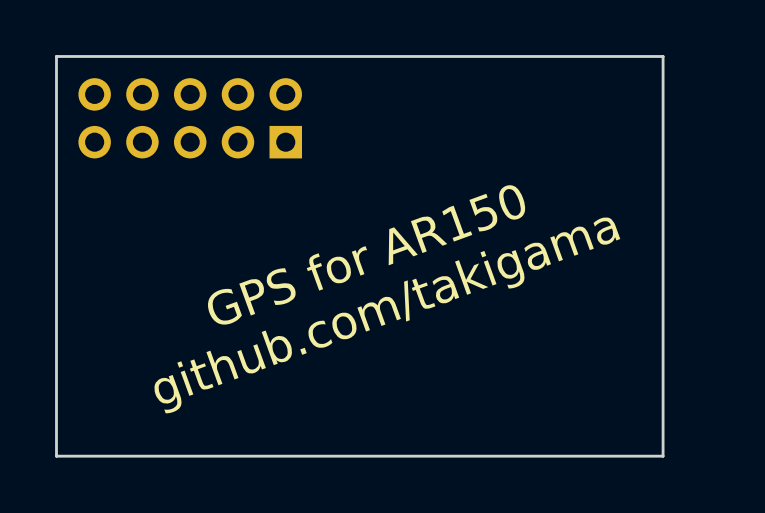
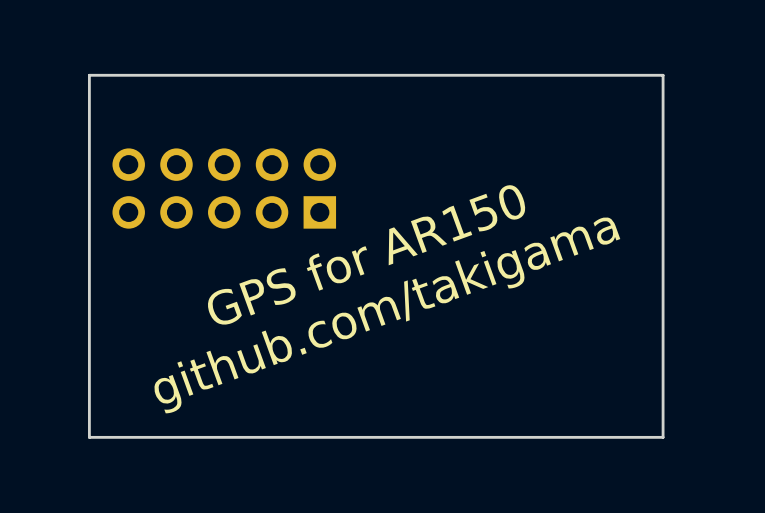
board edge: (663, 75) (663, 56) (56, 56) (56, 456) (663, 456) (663, 437) -> (663, 75) (89, 75) (89, 437) (663, 437)
part position: (190, 118) -> (224, 188)

